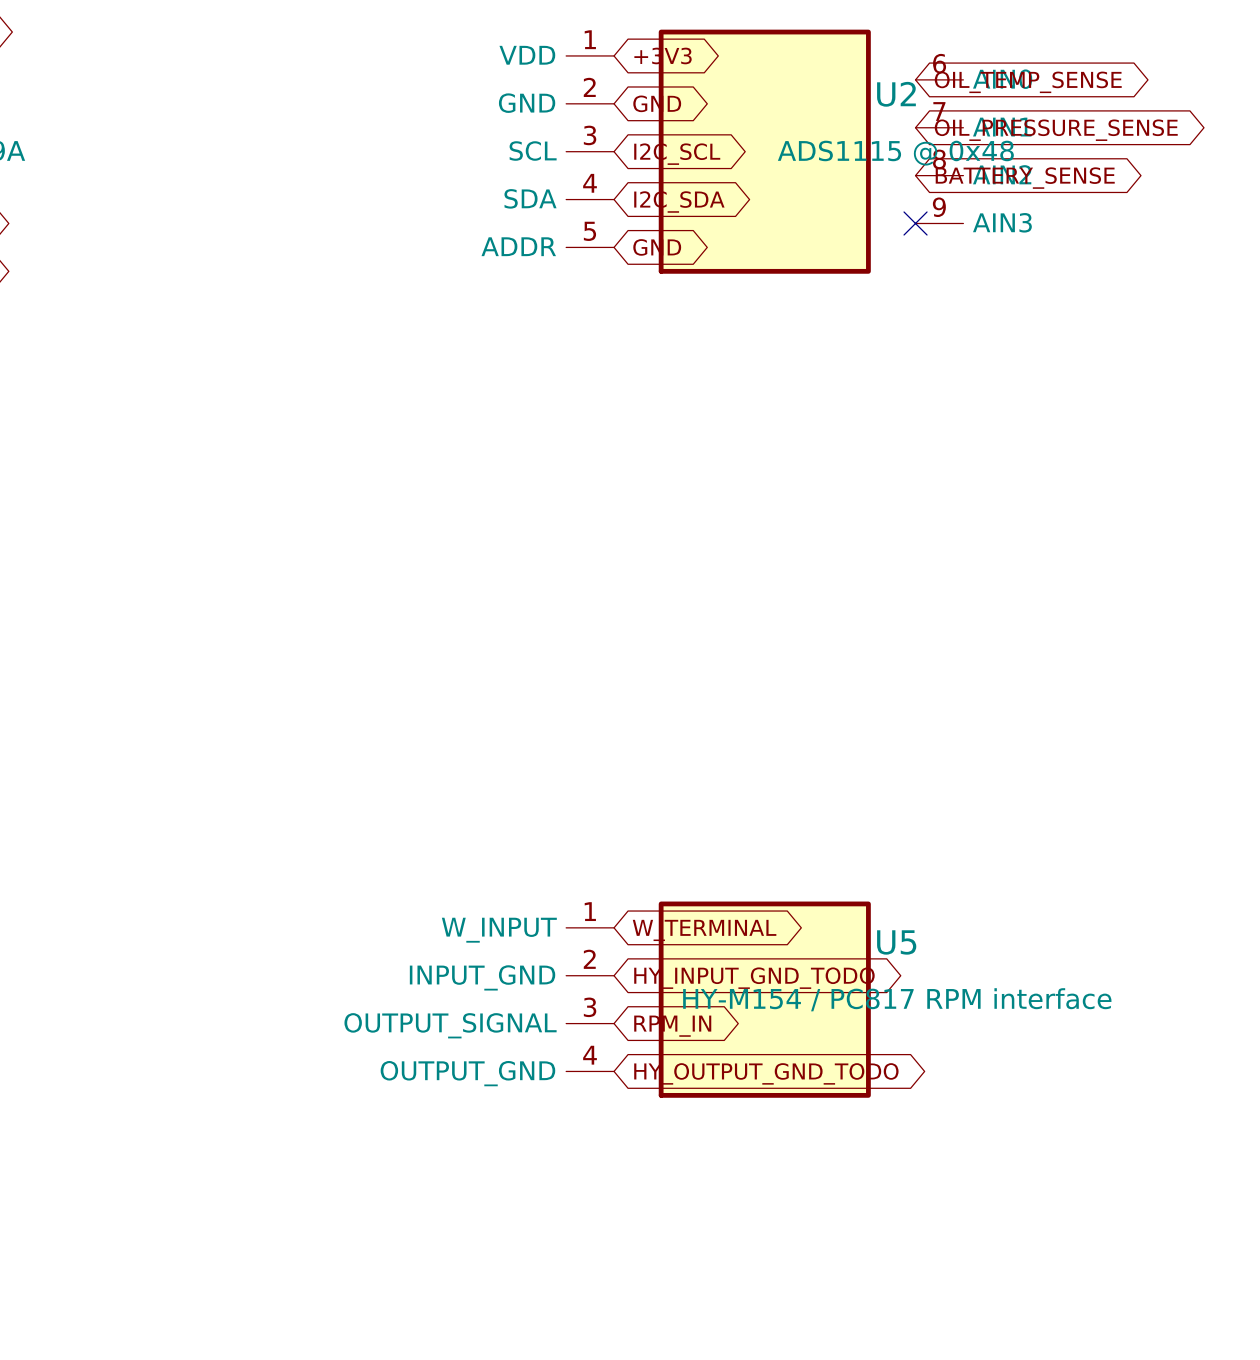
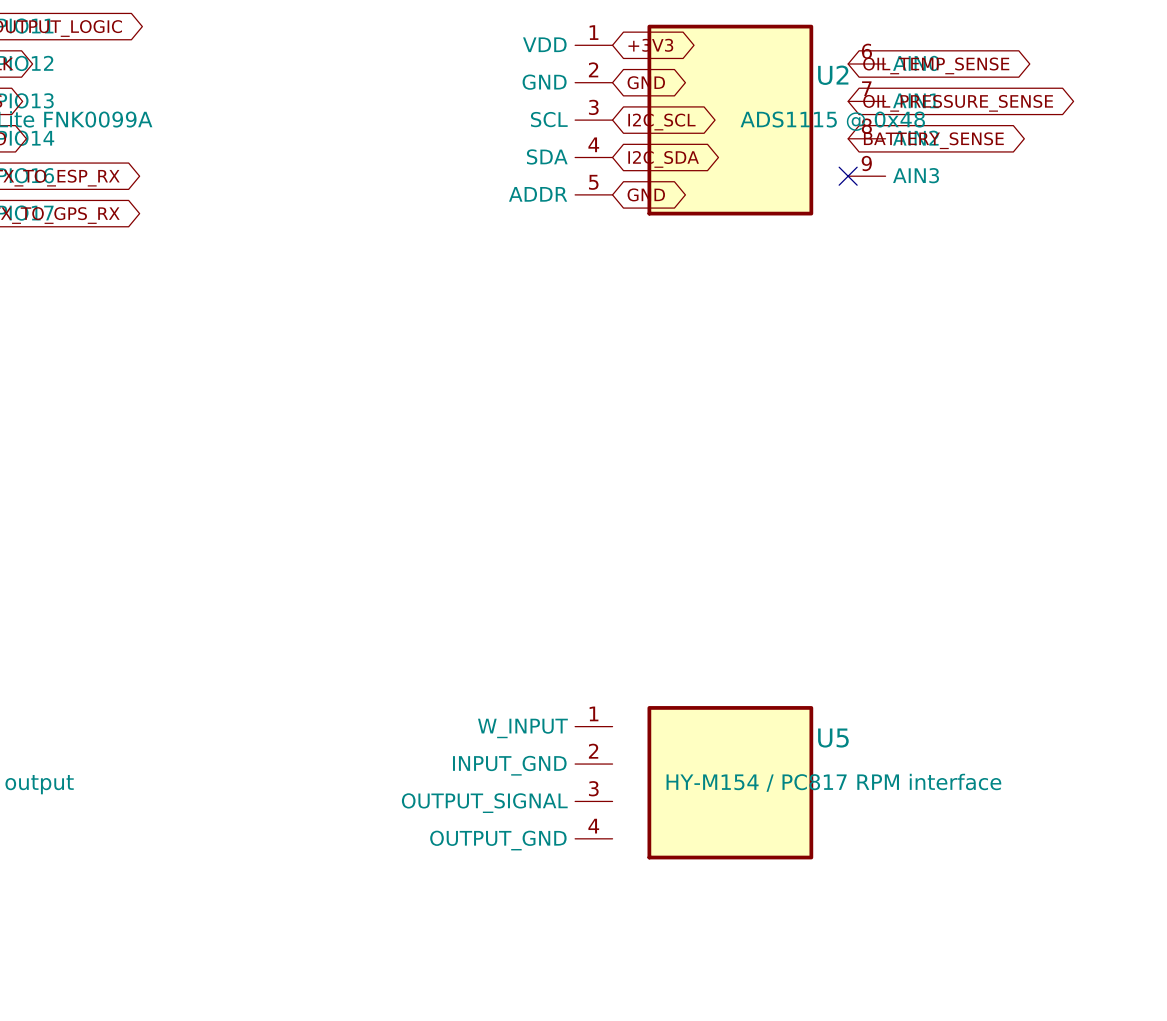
global label: W_TERMINAL (704, 930) -> none
global label: HY_INPUT_GND_TODO (754, 978) -> none
global label: RPM_IN (672, 1026) -> none
global label: HY_OUTPUT_GND_TODO (766, 1073) -> none

